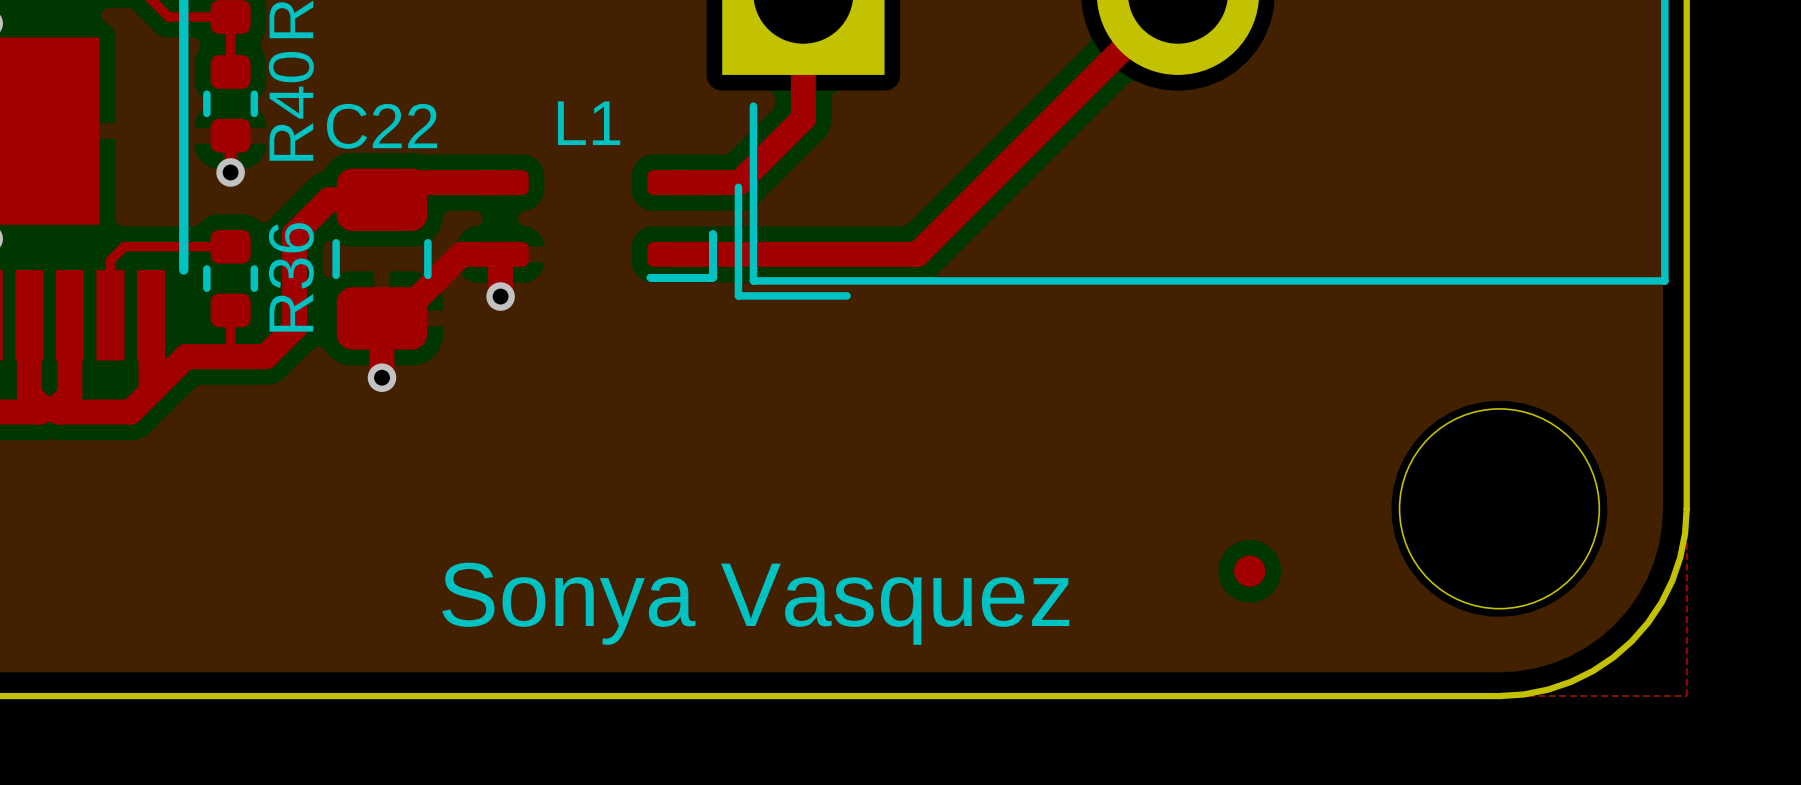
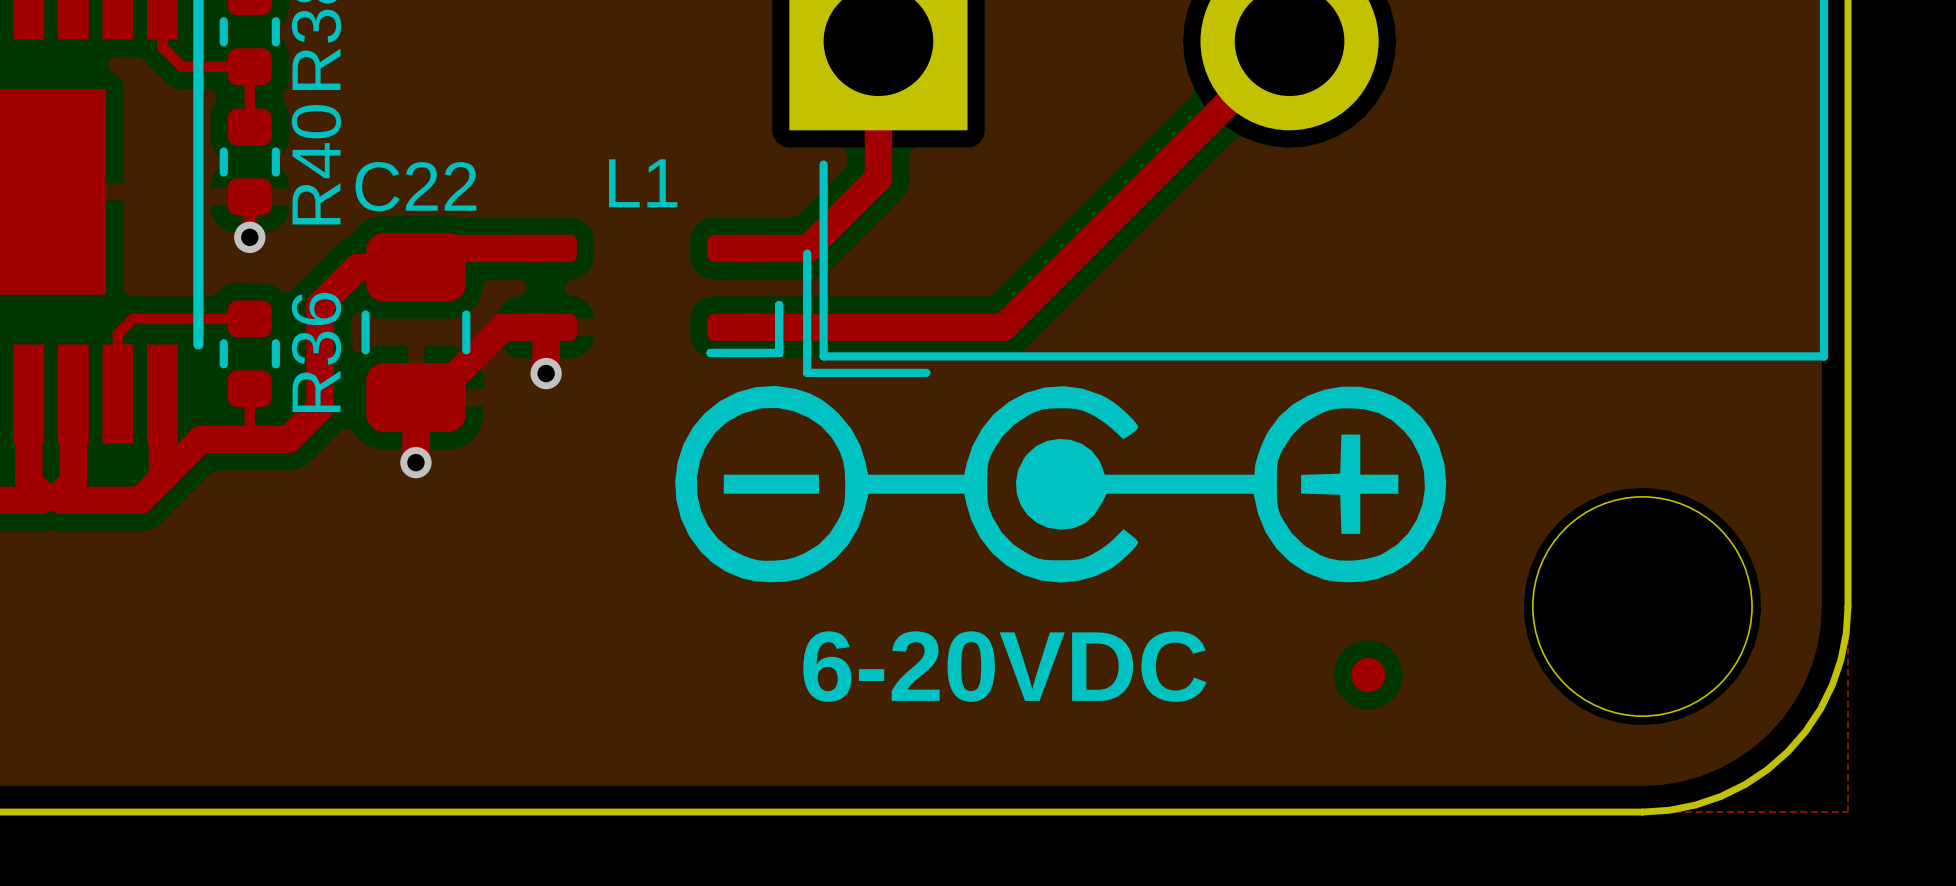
drawing: none -> [675, 385, 1447, 583]
text: none -> 6-20VDC (1004, 666)
text: Sonya Vasquez (755, 603) -> none

